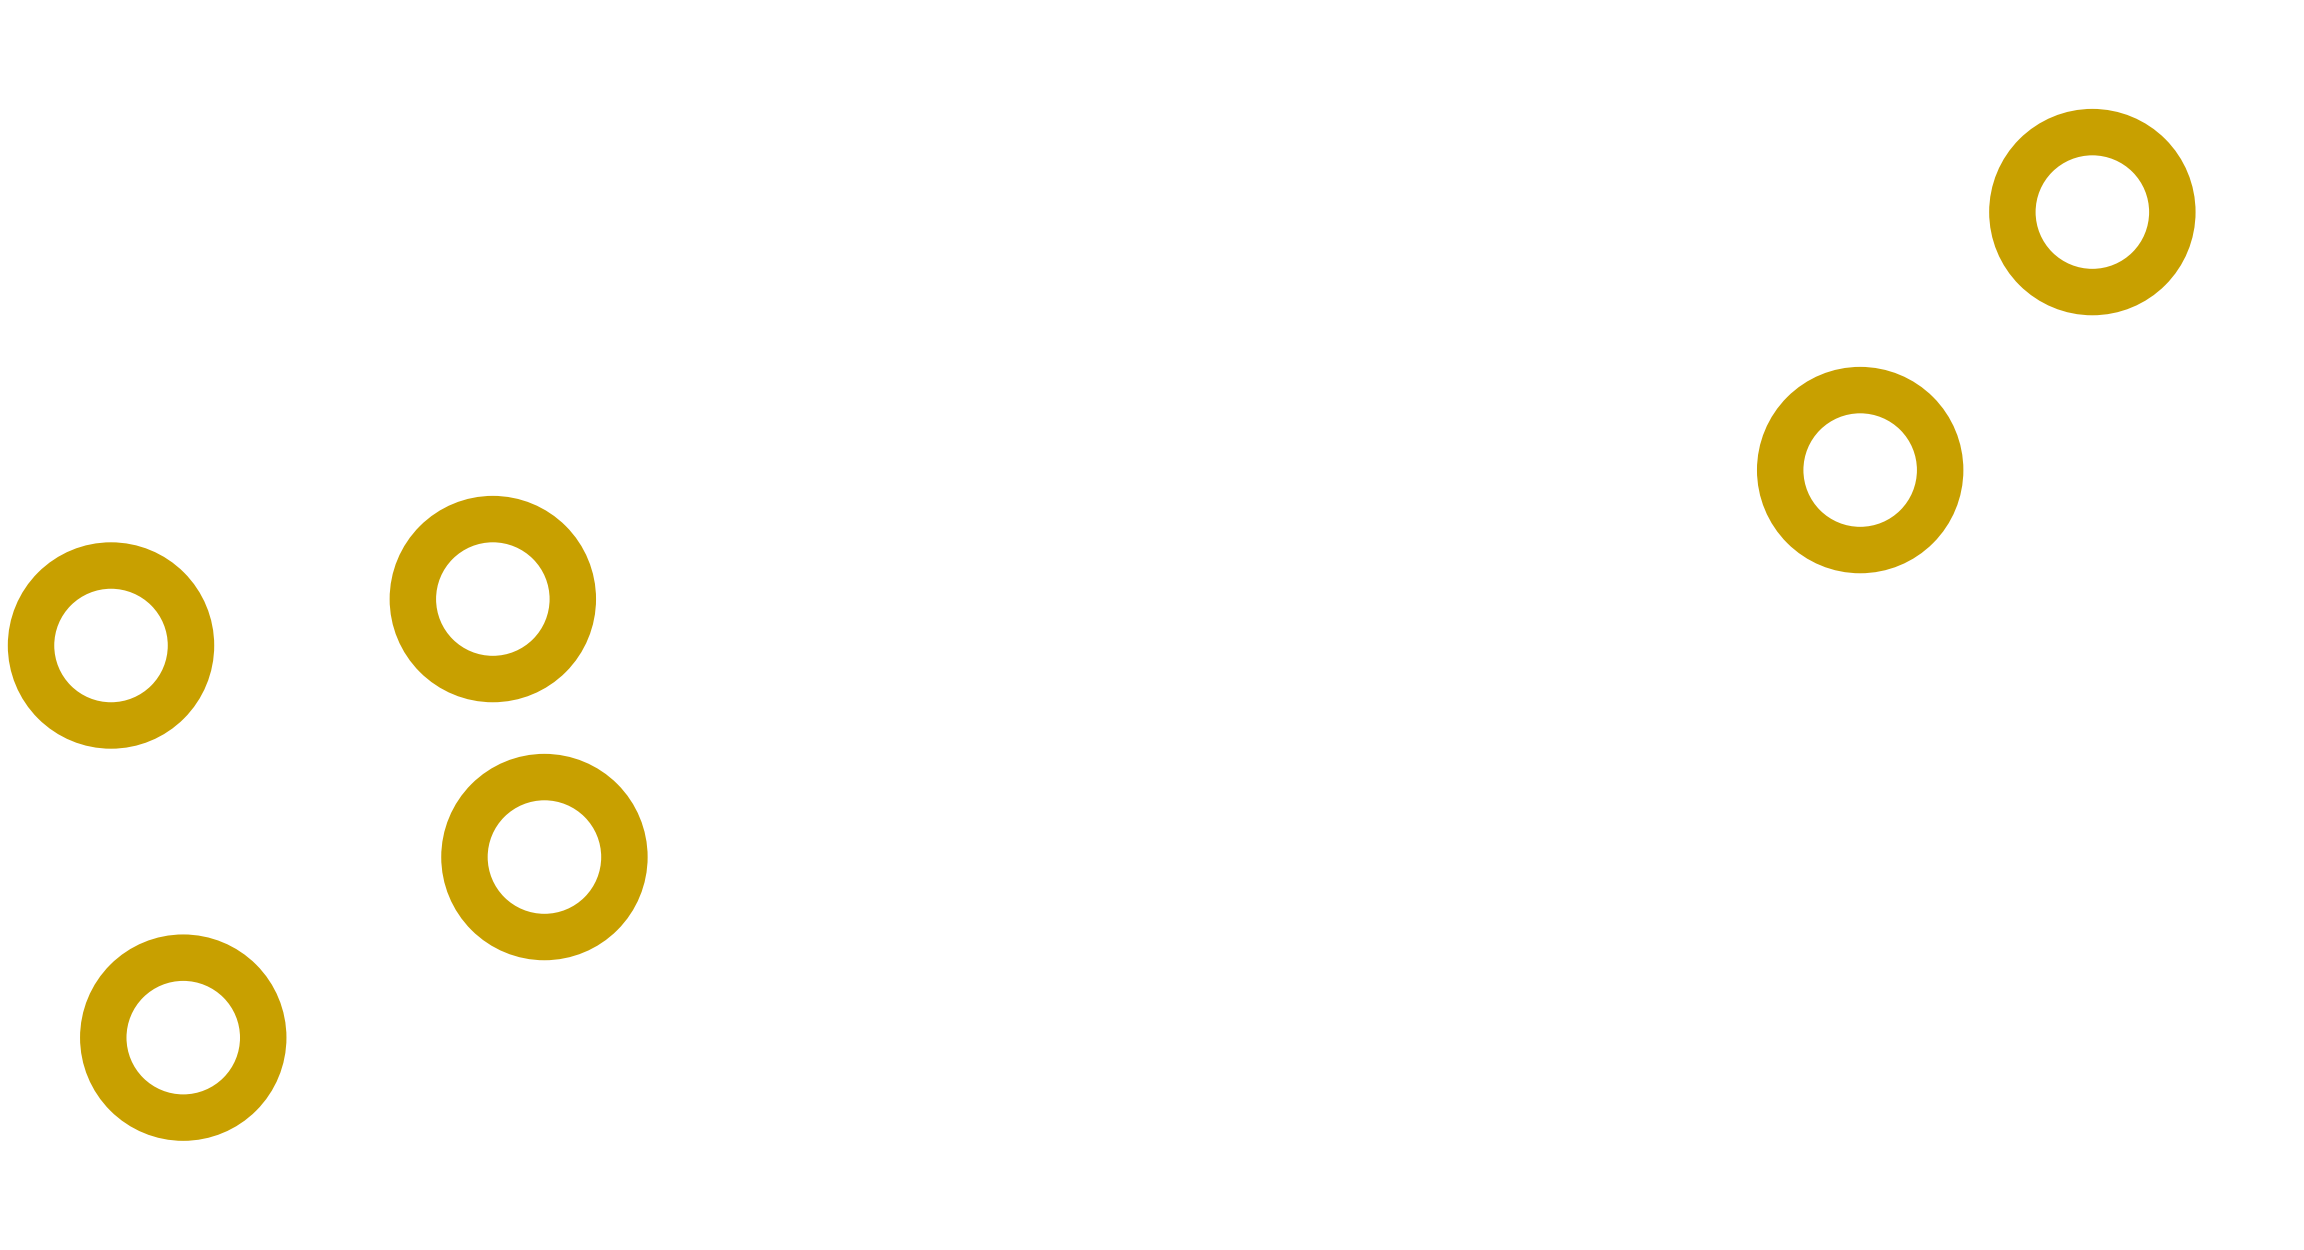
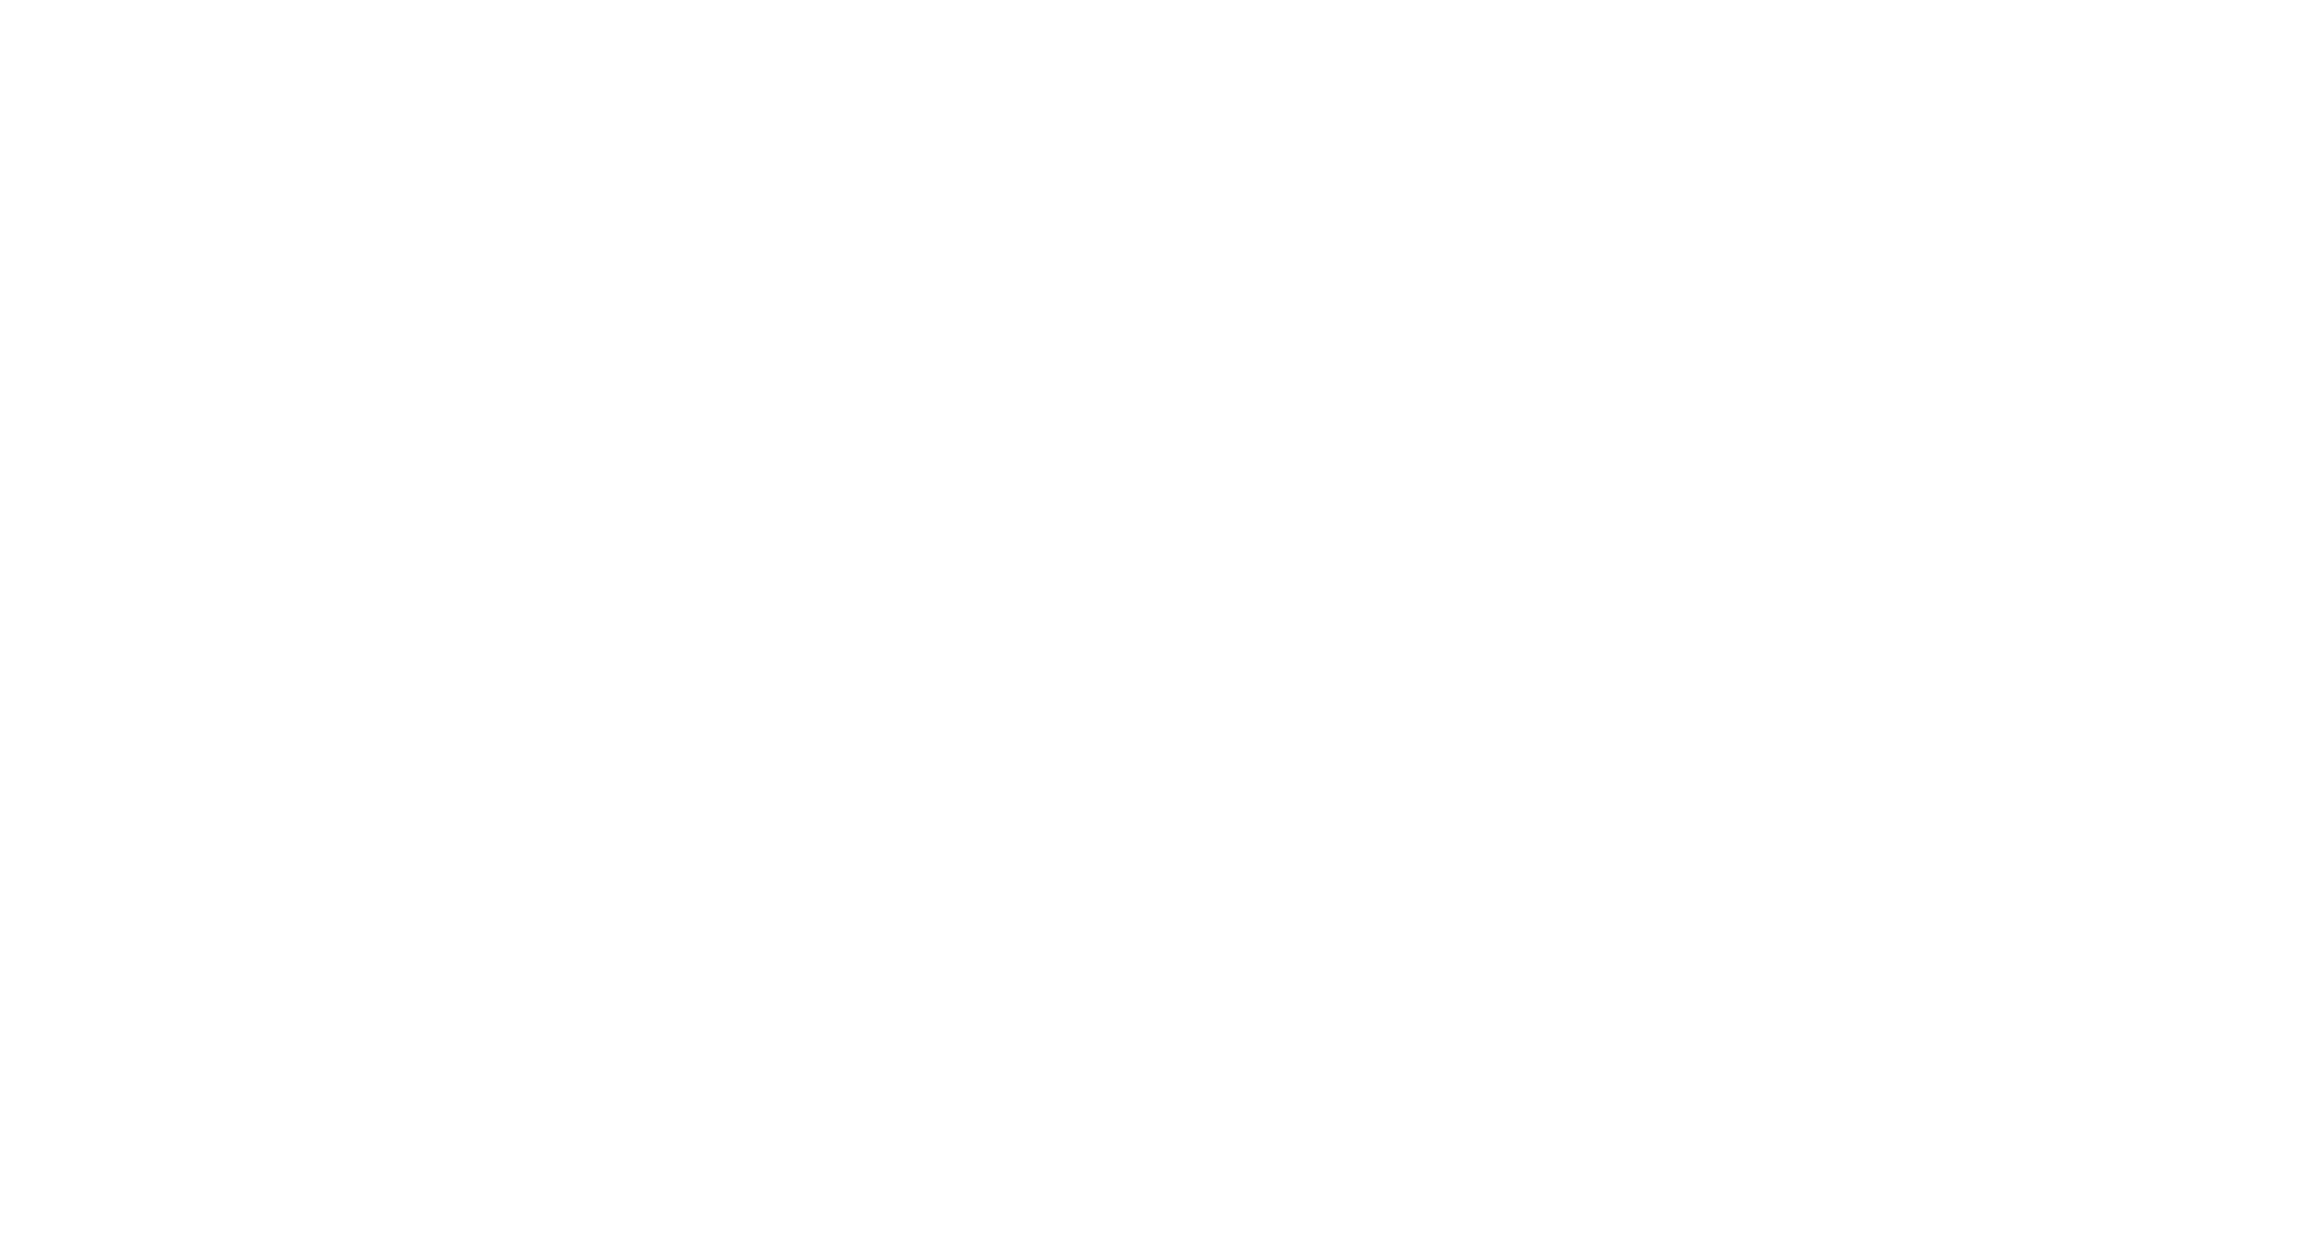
part: (2092, 212) -> none
part: (1860, 470) -> none
part: (492, 599) -> none
part: (111, 645) -> none
part: (544, 857) -> none
part: (183, 1037) -> none

